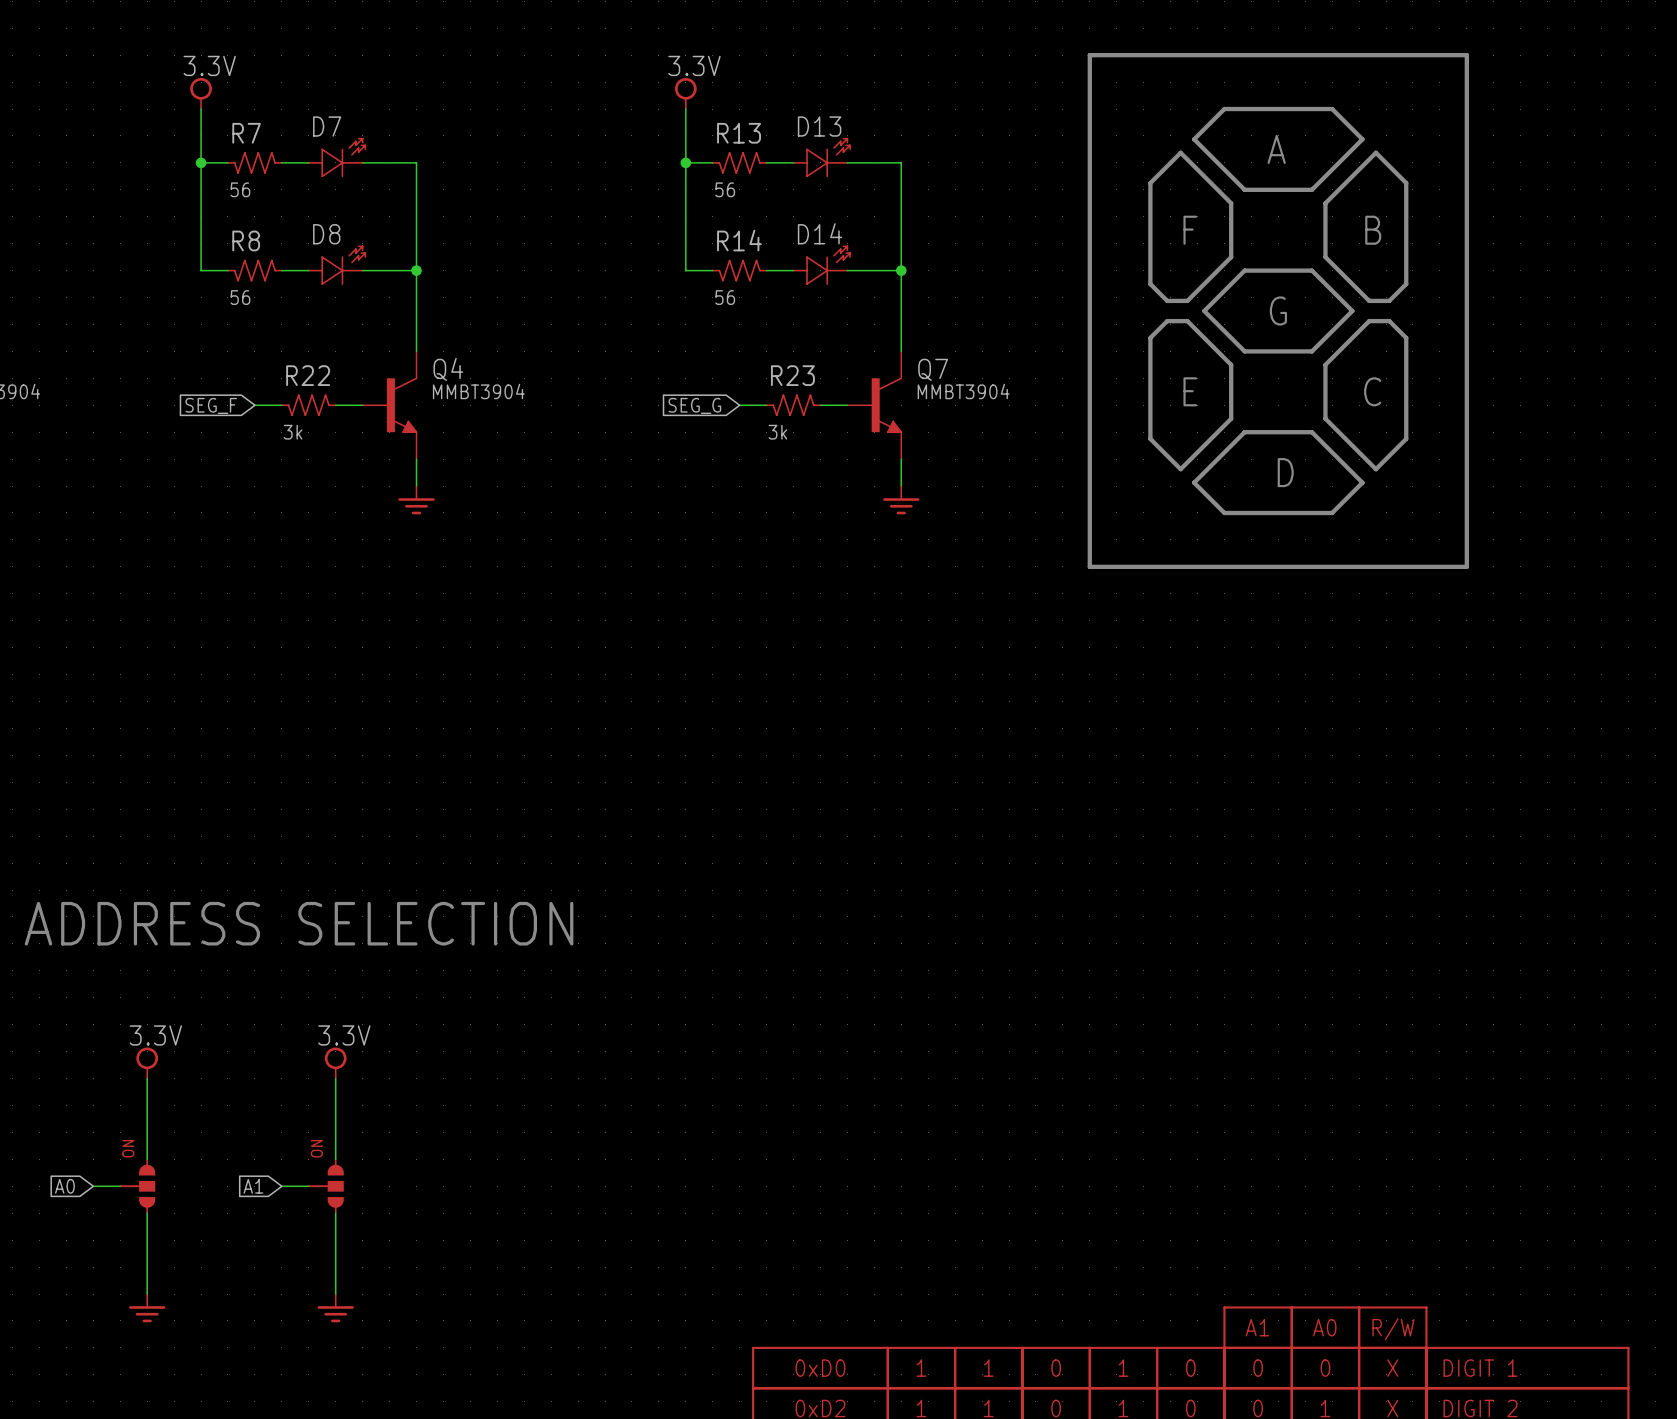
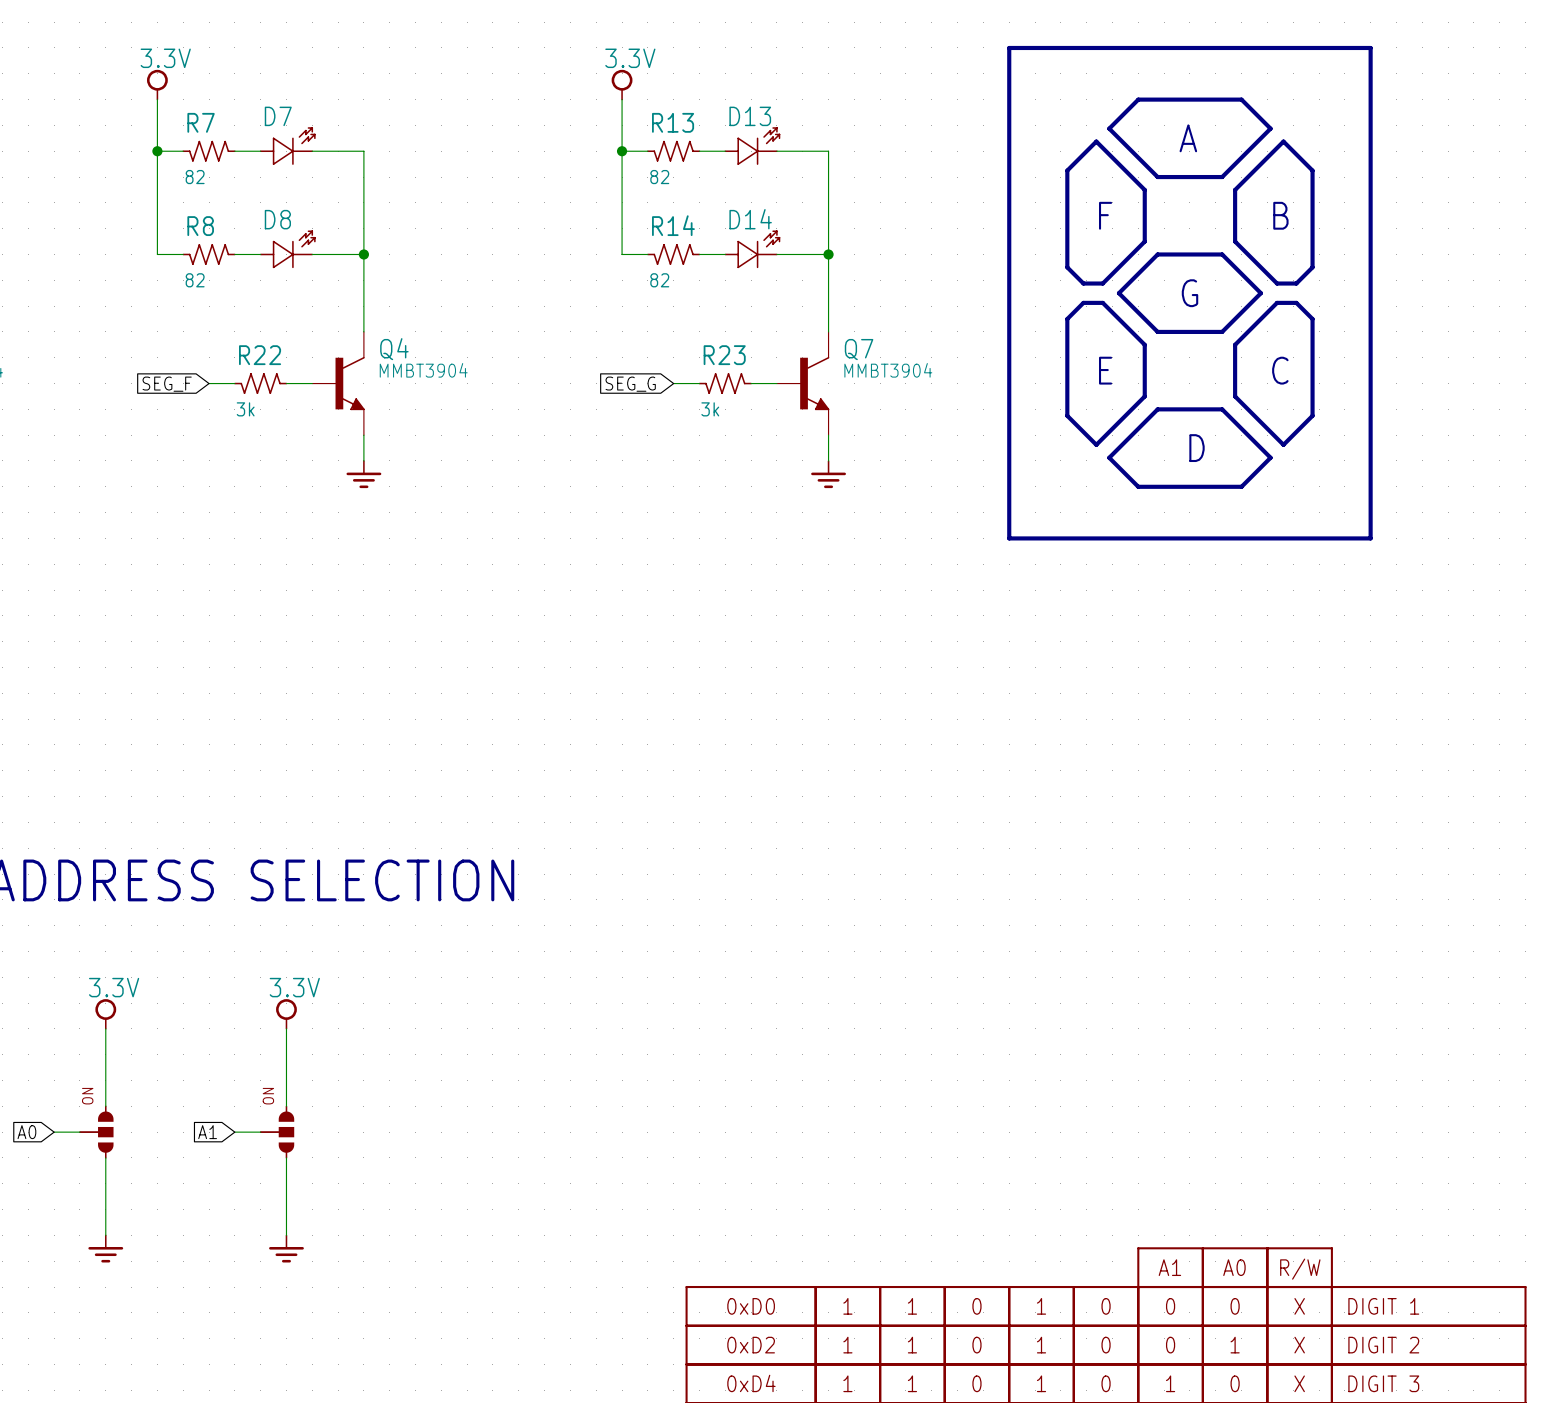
R7 value: 56 (240, 189) -> 82 (195, 177)
R13 value: 56 (725, 189) -> 82 (659, 177)
R8 value: 56 (240, 297) -> 82 (195, 280)
R14 value: 56 (725, 297) -> 82 (659, 280)

